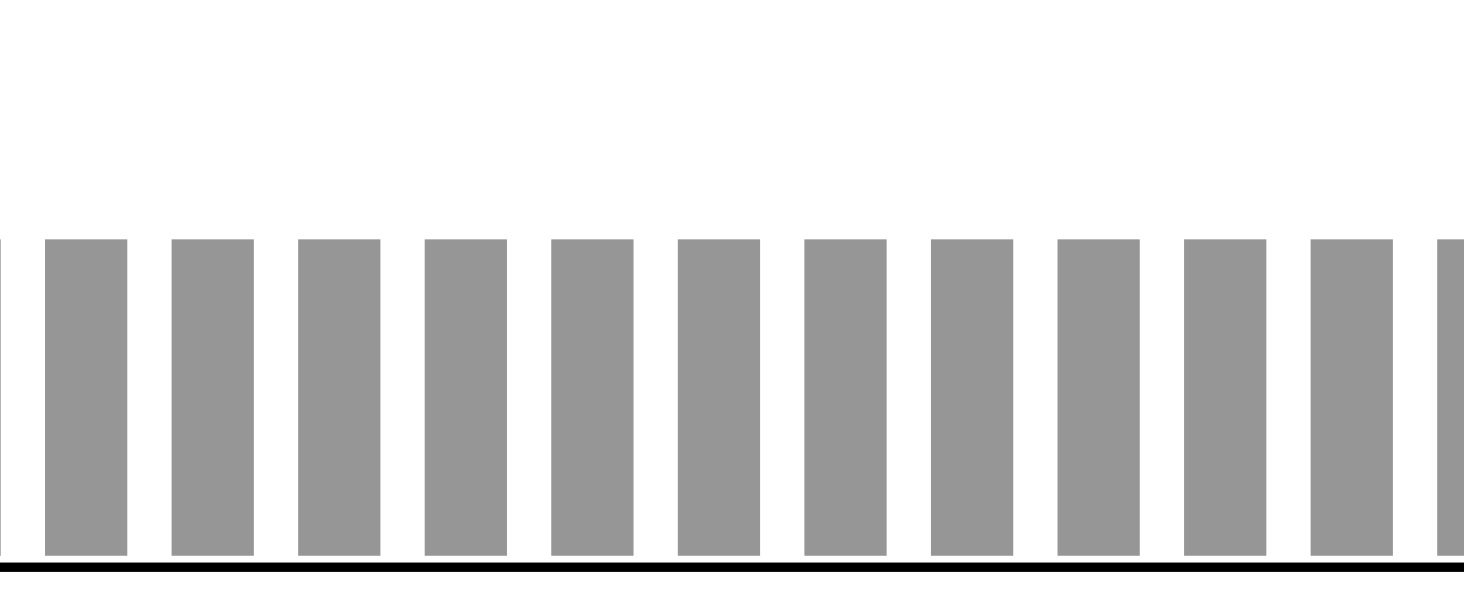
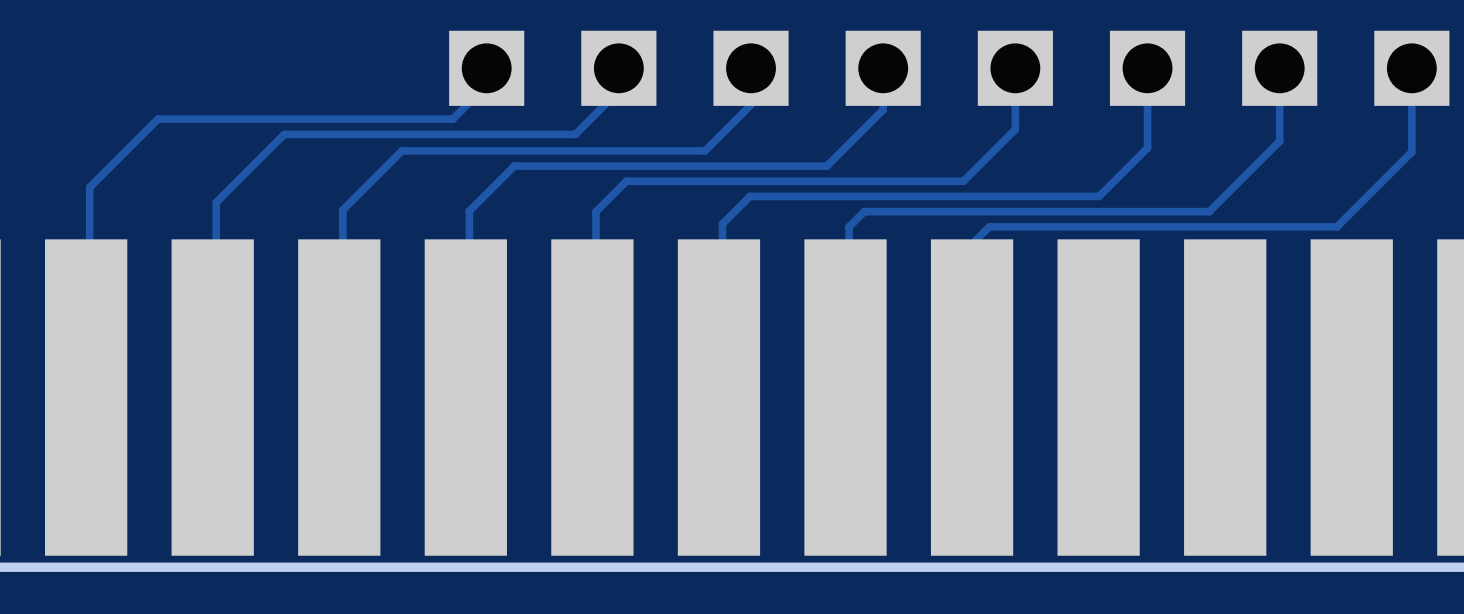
track: none -> (486, 68) (486, 85) (452, 119) (157, 119) (89, 187) (89, 399)
part: none -> (486, 68)
track: none -> (618, 68) (618, 90) (575, 134) (284, 134) (216, 202) (216, 399)
part: none -> (618, 68)
track: none -> (751, 68) (751, 104) (704, 150) (402, 150) (342, 210) (342, 399)
part: none -> (751, 68)
track: none -> (883, 68) (883, 109) (826, 166) (514, 166) (469, 211) (469, 399)
part: none -> (883, 68)
track: none -> (1015, 68) (1015, 129) (963, 181) (626, 181) (595, 211) (595, 399)
part: none -> (1015, 68)
track: none -> (1147, 68) (1147, 148) (1099, 196) (749, 196) (722, 223) (722, 399)
part: none -> (1147, 68)
track: none -> (1279, 68) (1279, 141) (1209, 211) (864, 211) (849, 226) (849, 399)
part: none -> (1279, 68)
track: none -> (1411, 68) (1411, 151) (1337, 226) (989, 226) (975, 240) (975, 399)
part: none -> (1411, 68)

